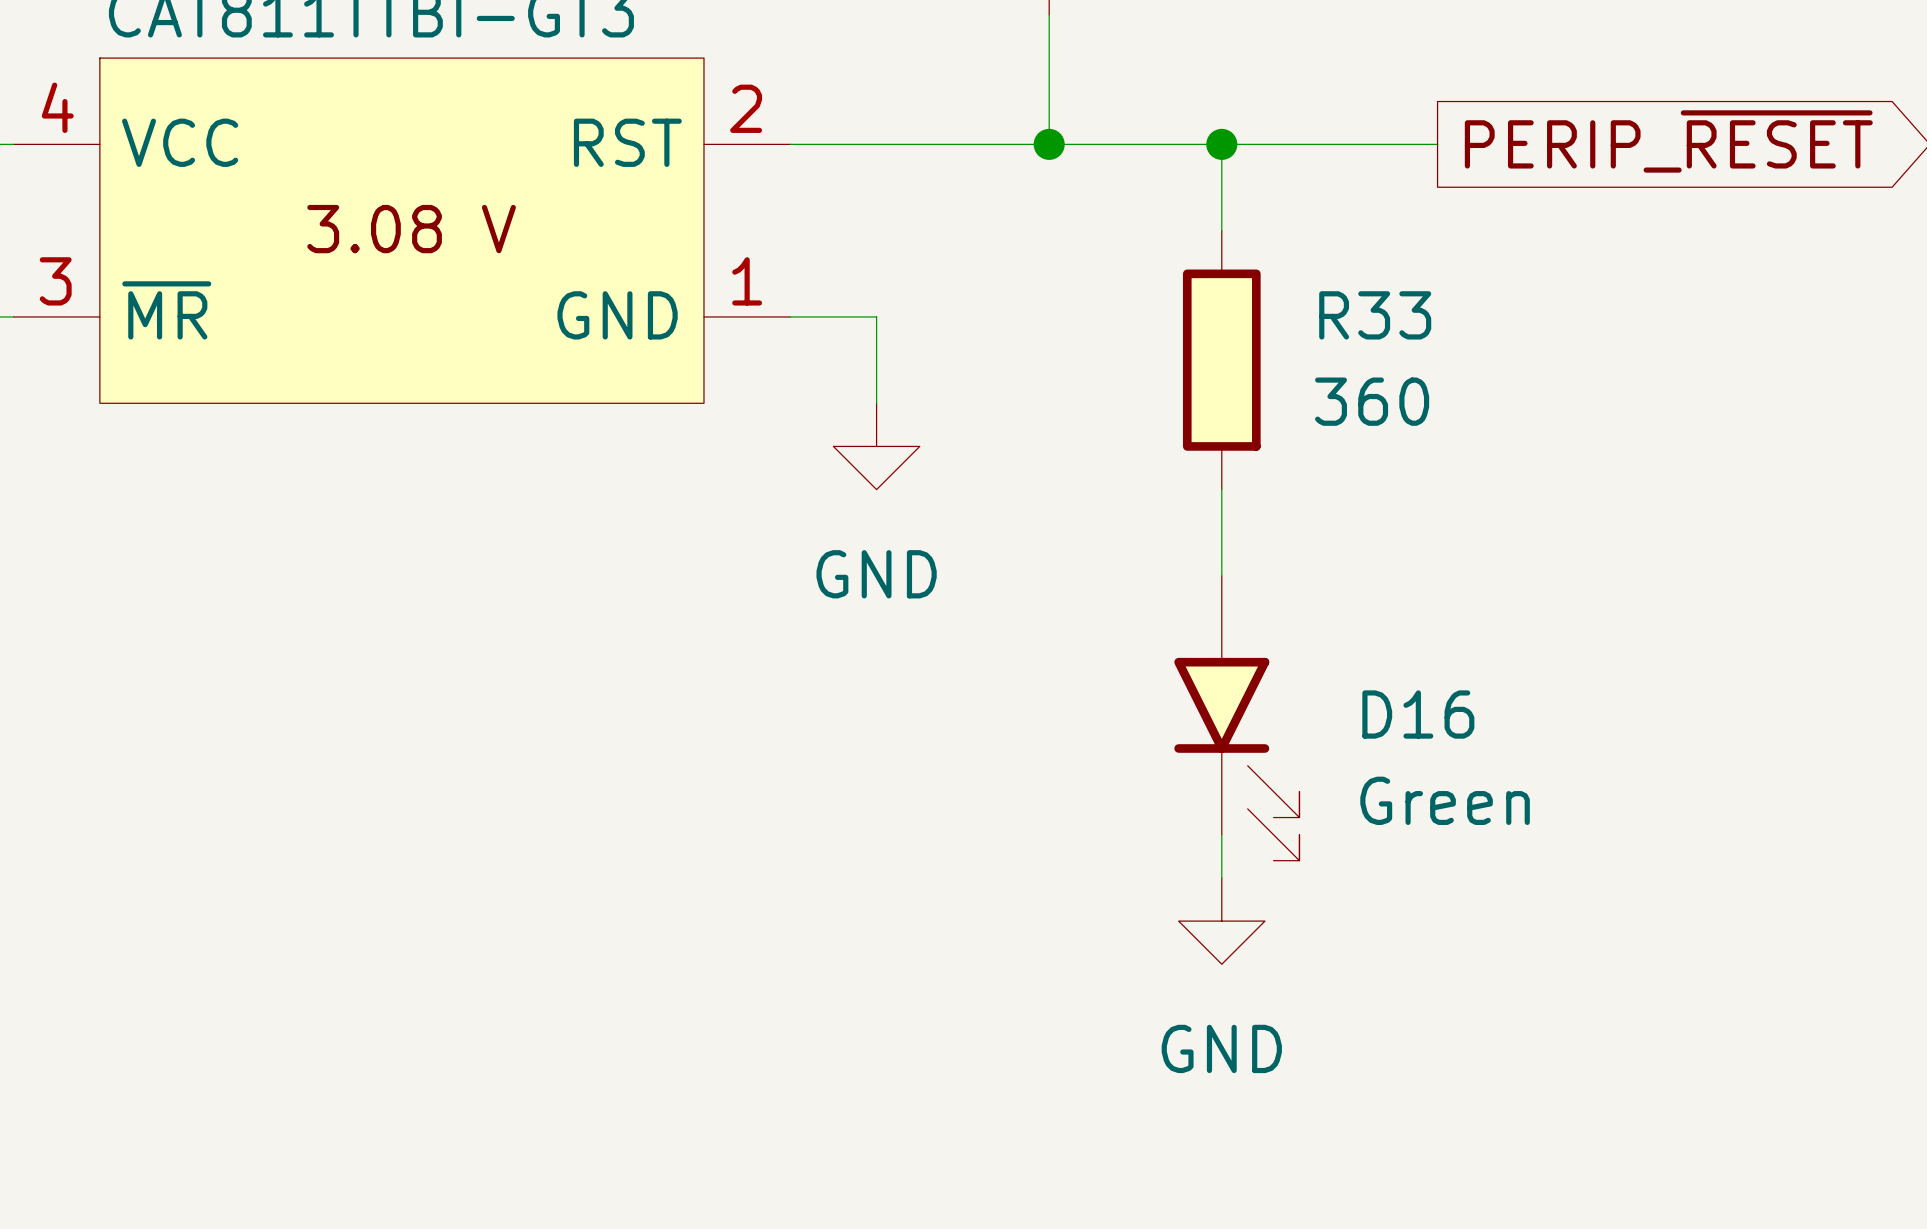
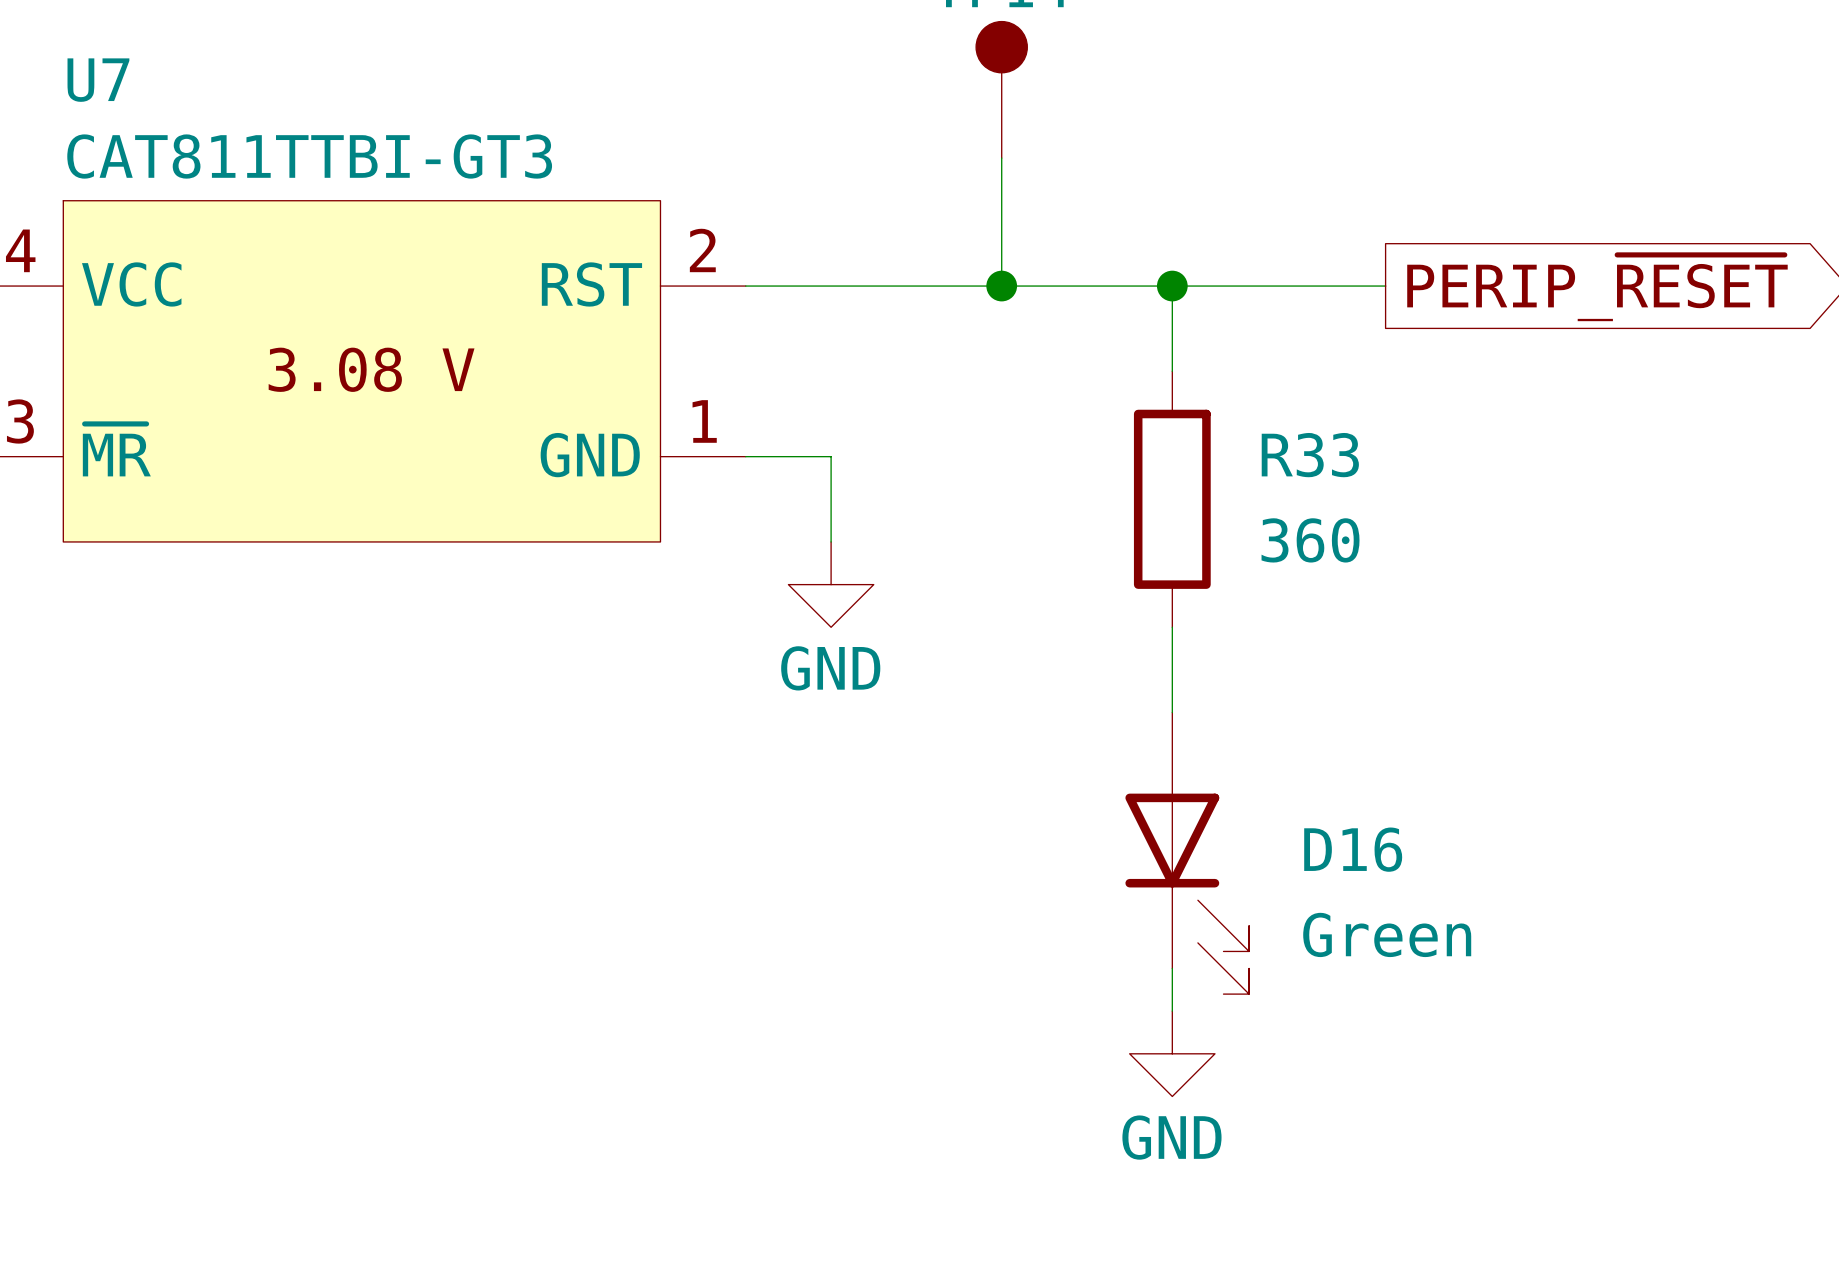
R33 symbol: [1182, 230, 1261, 490] -> [1133, 371, 1211, 628]
power symbol text position: GND (876, 574) -> GND (830, 668)
D16 symbol: [1174, 575, 1300, 861] -> [1125, 712, 1250, 995]
power symbol text position: GND (1221, 1048) -> GND (1171, 1137)

